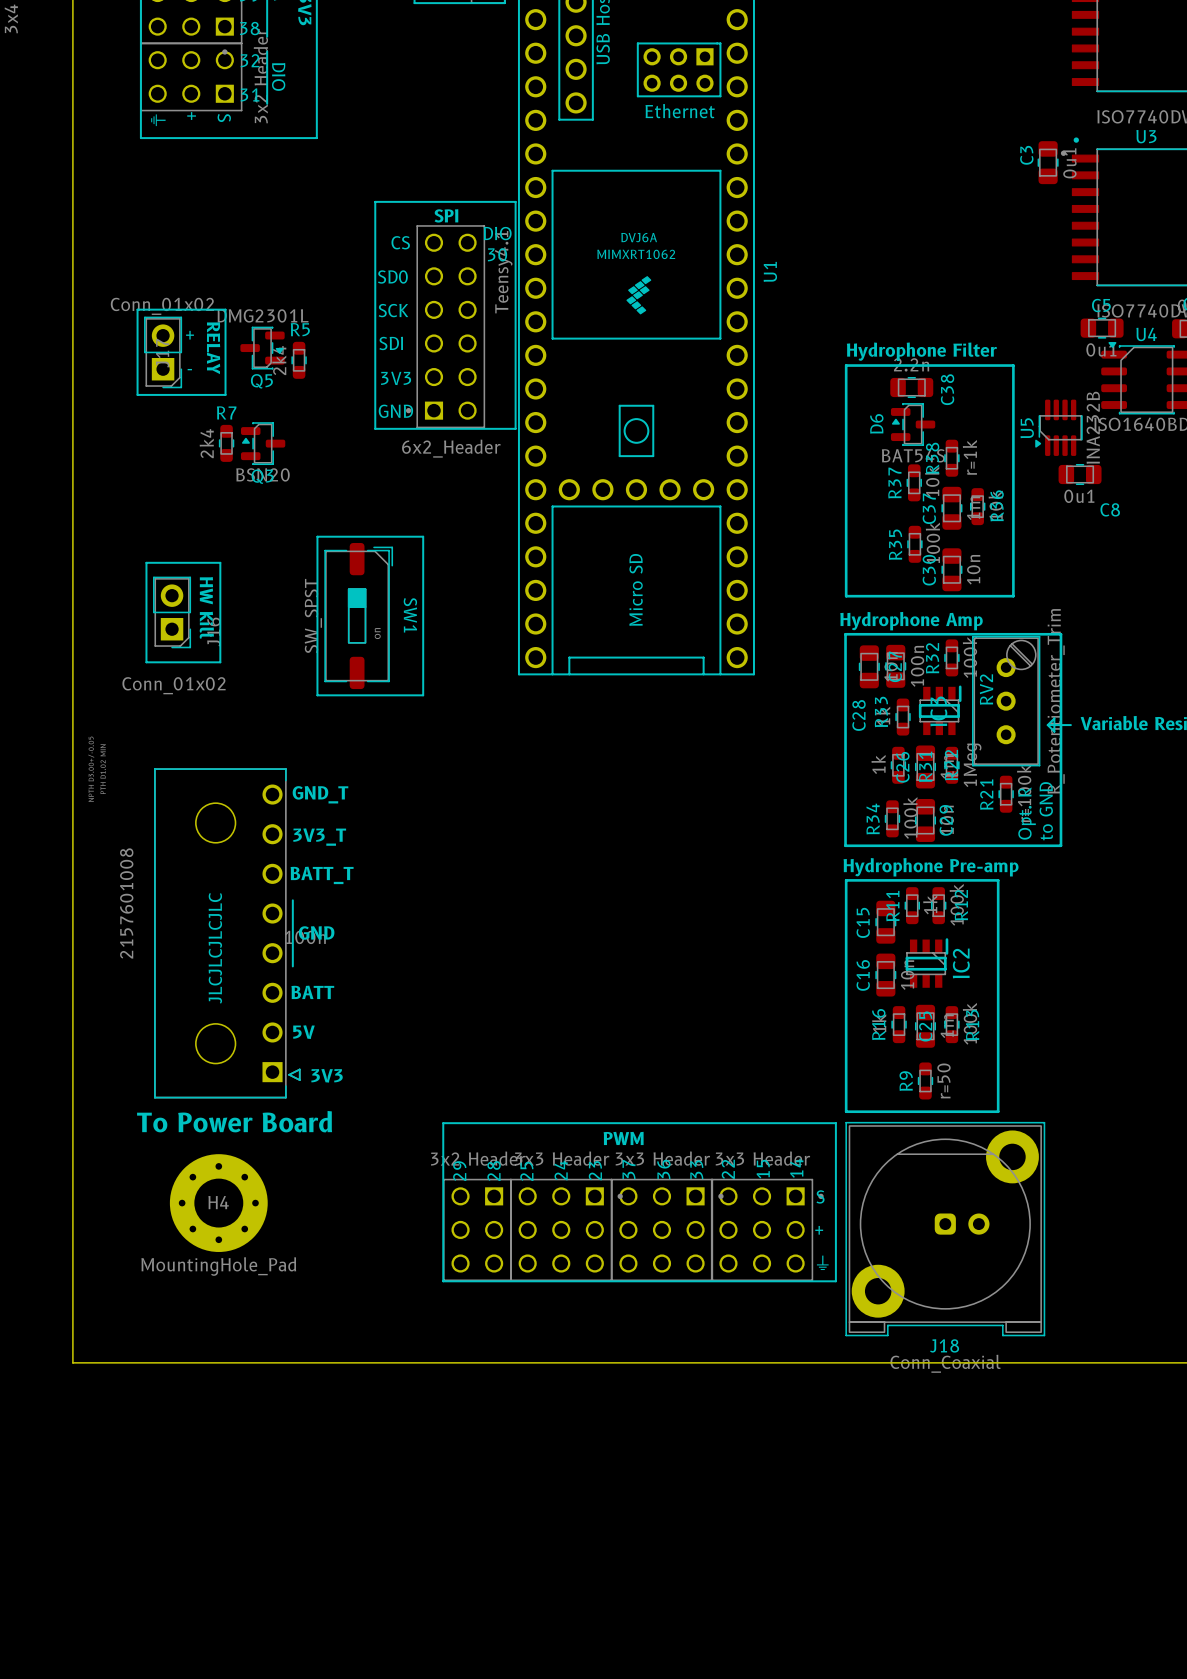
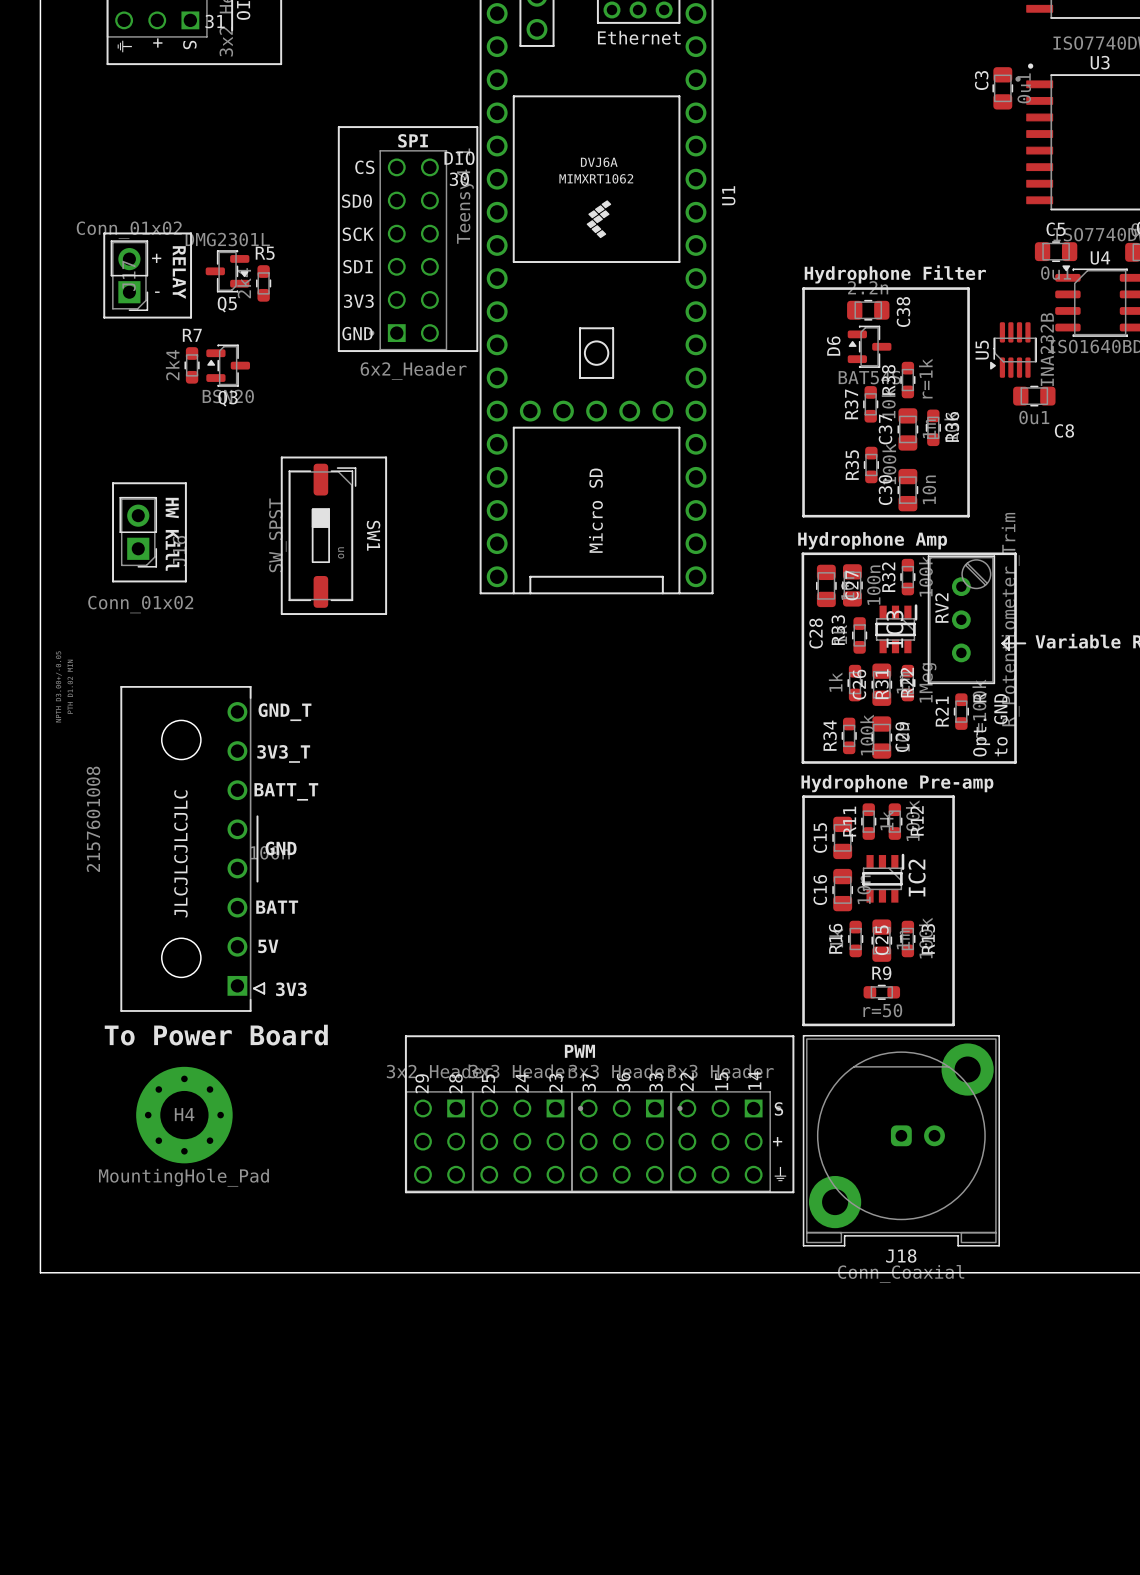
R9 rotation: 0° (925, 1080) -> 90° clockwise (881, 992)

